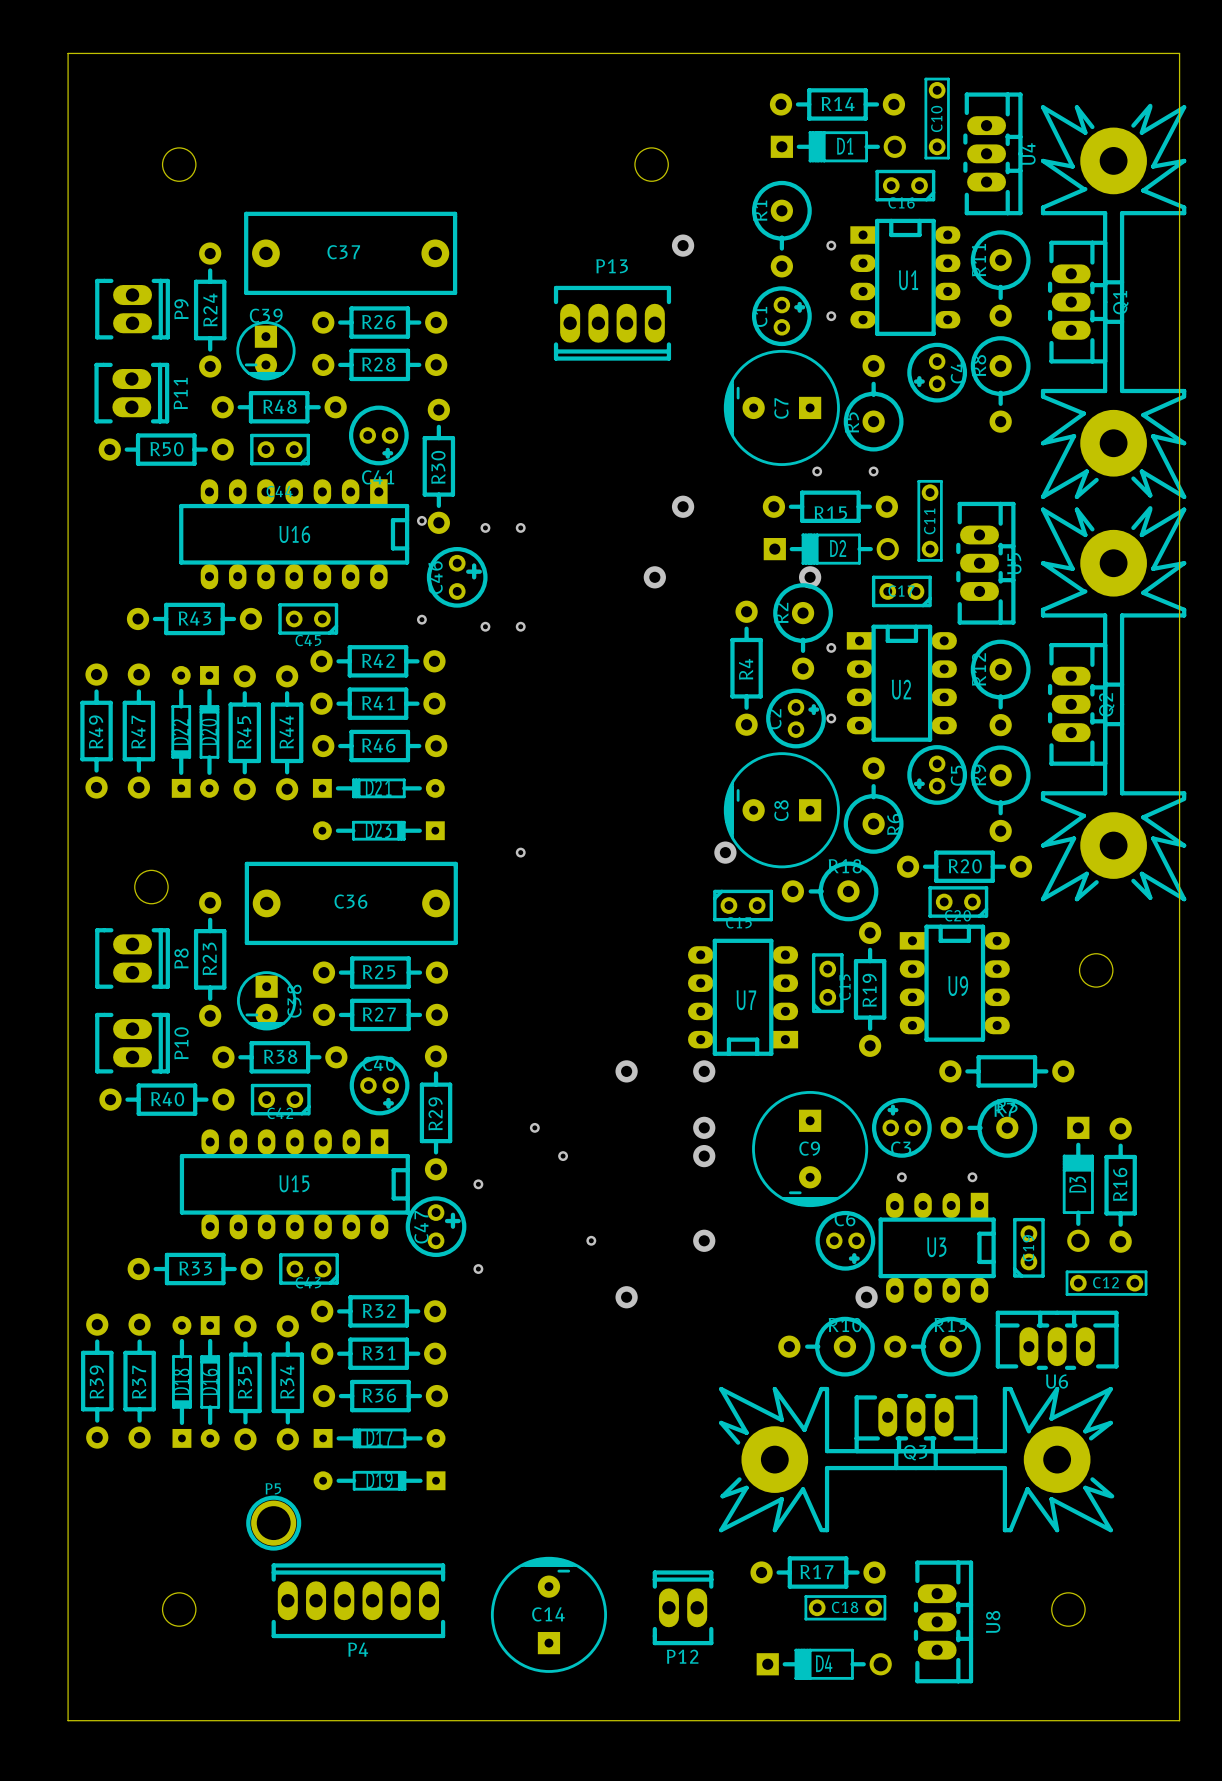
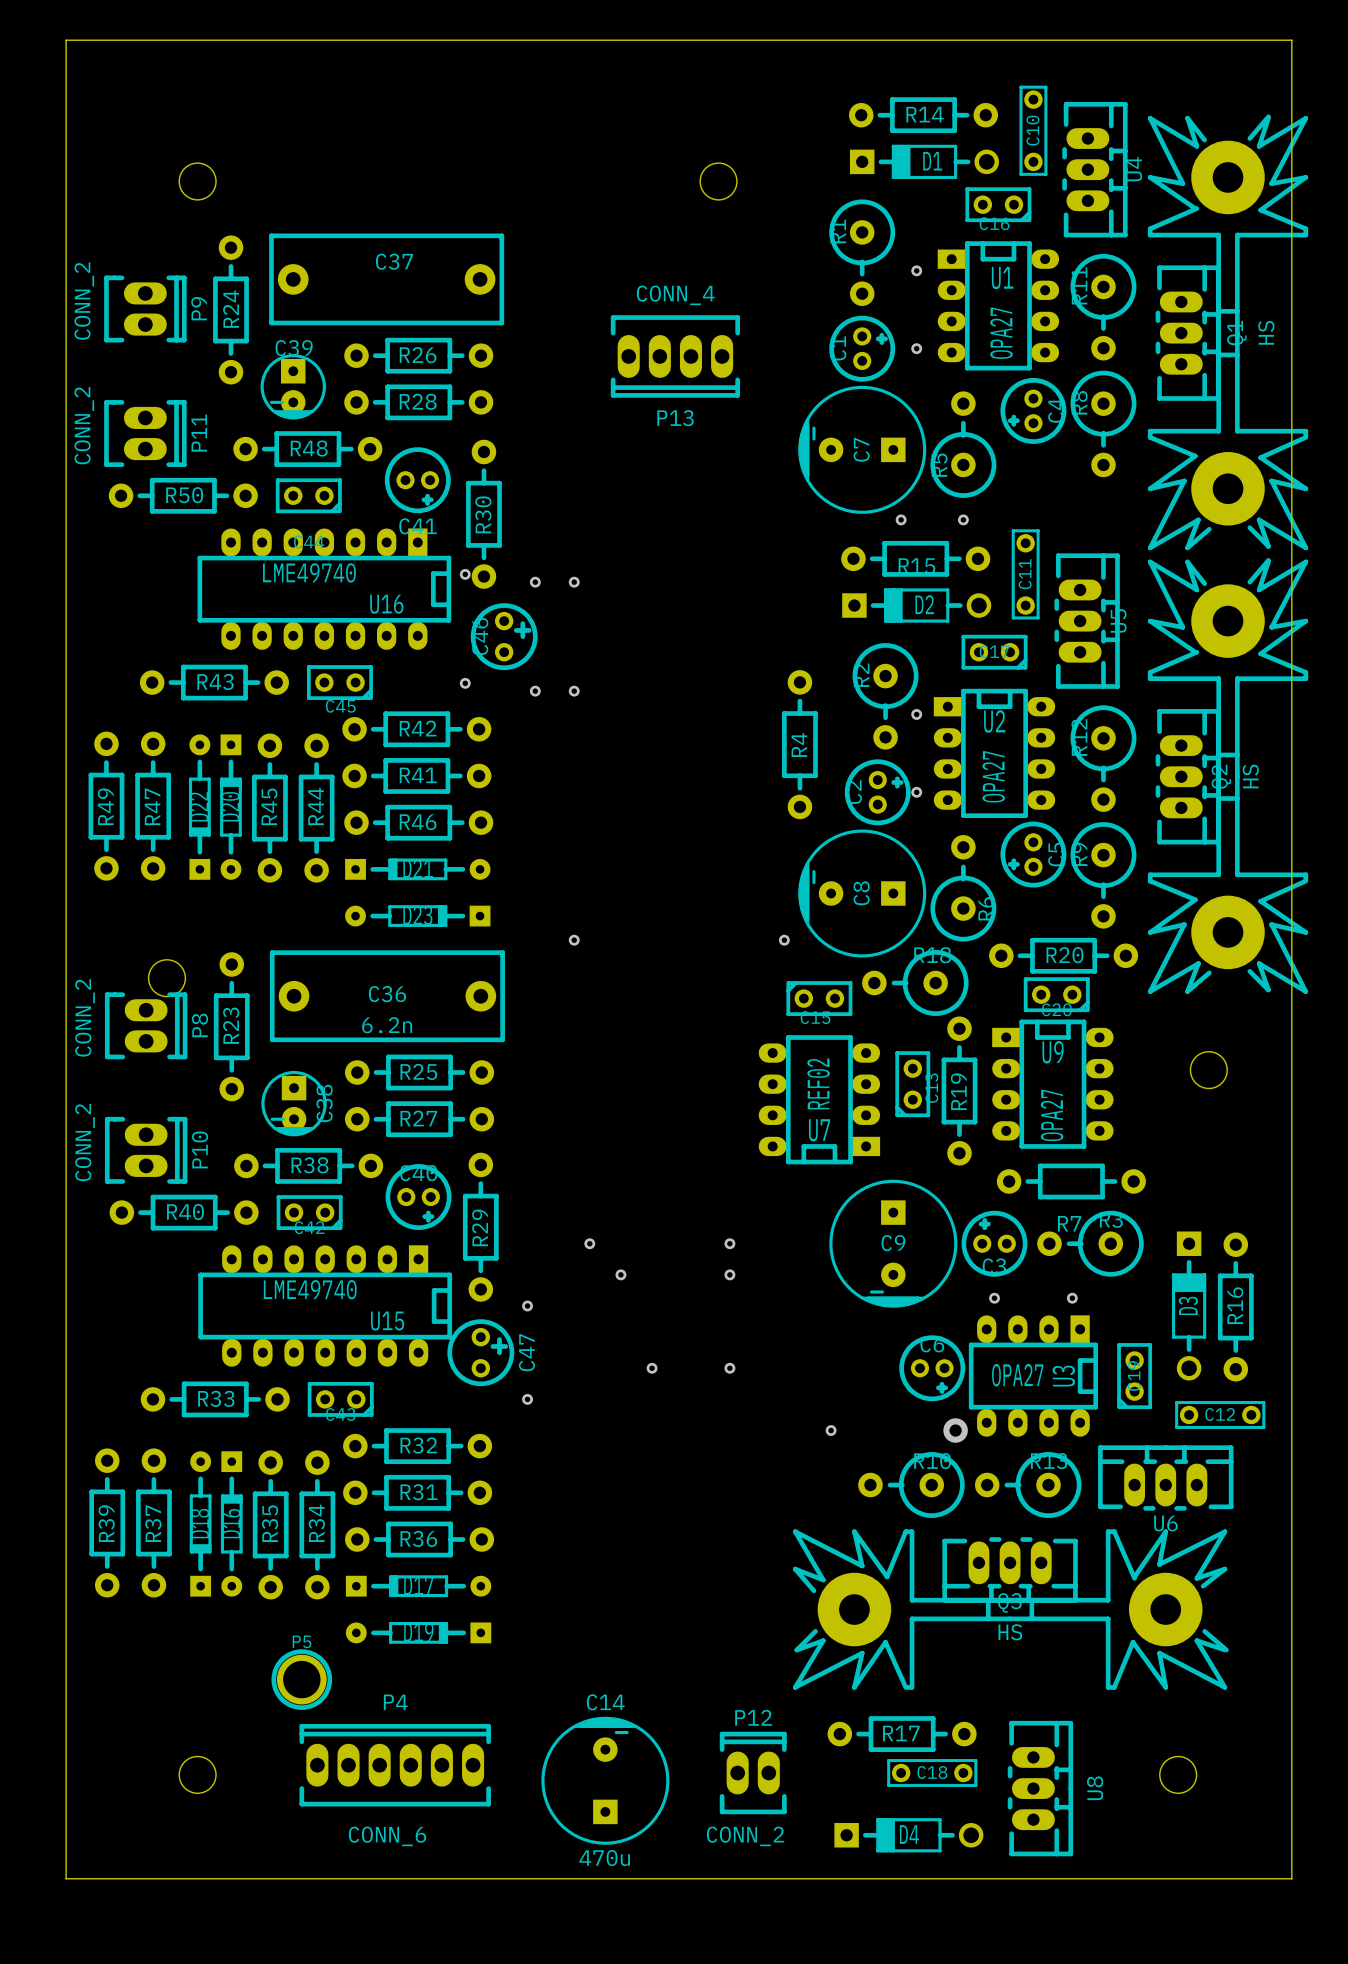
board edge: (68, 53) (1179, 53) (1179, 1720) (68, 1720) (68, 53) -> (66, 40) (1291, 40) (1291, 1878) (66, 1878) (66, 40)
via: (683, 245) -> none
C37 name position: C37 (343, 252) -> C37 (394, 261)
P13 name position: P13 (612, 266) -> P13 (675, 418)
P13 value: none -> CONN_4 (675, 295)
P9 value: none -> CONN_2 (84, 301)
U1 name position: U1 (908, 280) -> U1 (1002, 278)
HS name: none -> HS (1266, 332)
U1 value: none -> OPA27 (1001, 333)
P9 position: (132, 309) -> (145, 308)
R24 position: (210, 310) -> (230, 309)
P11 value: none -> CONN_2 (84, 425)
via: (683, 506) -> none
U16 value: none -> LME49740 (309, 572)
U16 name position: U16 (294, 534) -> U16 (386, 604)
via: (654, 577) -> none
via: (810, 577) -> none
R4 position: (746, 668) -> (799, 744)
U2 name position: U2 (901, 689) -> U2 (994, 721)
U2 value: none -> OPA27 (993, 776)
HS name: none -> HS (1250, 776)
via: none -> (784, 940)
via: (725, 852) -> none
P8 value: none -> CONN_2 (85, 1017)
C36 value: none -> 6.2n (387, 1025)
P8 position: (132, 958) -> (146, 1025)
R23 position: (210, 959) -> (231, 1026)
U7 value: none -> REF02 (818, 1083)
U9 name position: U9 (958, 986) -> U9 (1053, 1052)
U7 name position: U7 (746, 1000) -> U7 (819, 1130)
U9 value: none -> OPA27 (1052, 1115)
P10 value: none -> CONN_2 (85, 1142)
via: (626, 1071) -> none
via: (704, 1071) -> none
R7 position: (1006, 1071) -> (1071, 1181)
via: none -> (729, 1243)
via: (704, 1127) -> none
C9 position: (810, 1149) -> (893, 1243)
via: none -> (729, 1274)
via: (704, 1156) -> none
U15 value: none -> LME49740 (310, 1289)
U15 name position: U15 (294, 1183) -> U15 (387, 1321)
C47 name position: C47 (421, 1227) -> C47 (526, 1352)
via: none -> (729, 1368)
via: (704, 1240) -> none
U3 value: none -> OPA27 (1017, 1375)
U3 name rotation: 0° (936, 1247) -> 90° counterclockwise (1063, 1376)
via: (626, 1297) -> none
via: none -> (831, 1430)
HS name: none -> HS (1010, 1632)
C14 name position: C14 (548, 1614) -> C14 (605, 1702)
P4 name position: P4 (358, 1649) -> P4 (395, 1702)
P12 name position: P12 (682, 1656) -> P12 (753, 1717)
P4 value: none -> CONN_6 (387, 1836)
P12 value: none -> CONN_2 (745, 1836)
C14 value: none -> 470u (604, 1858)

